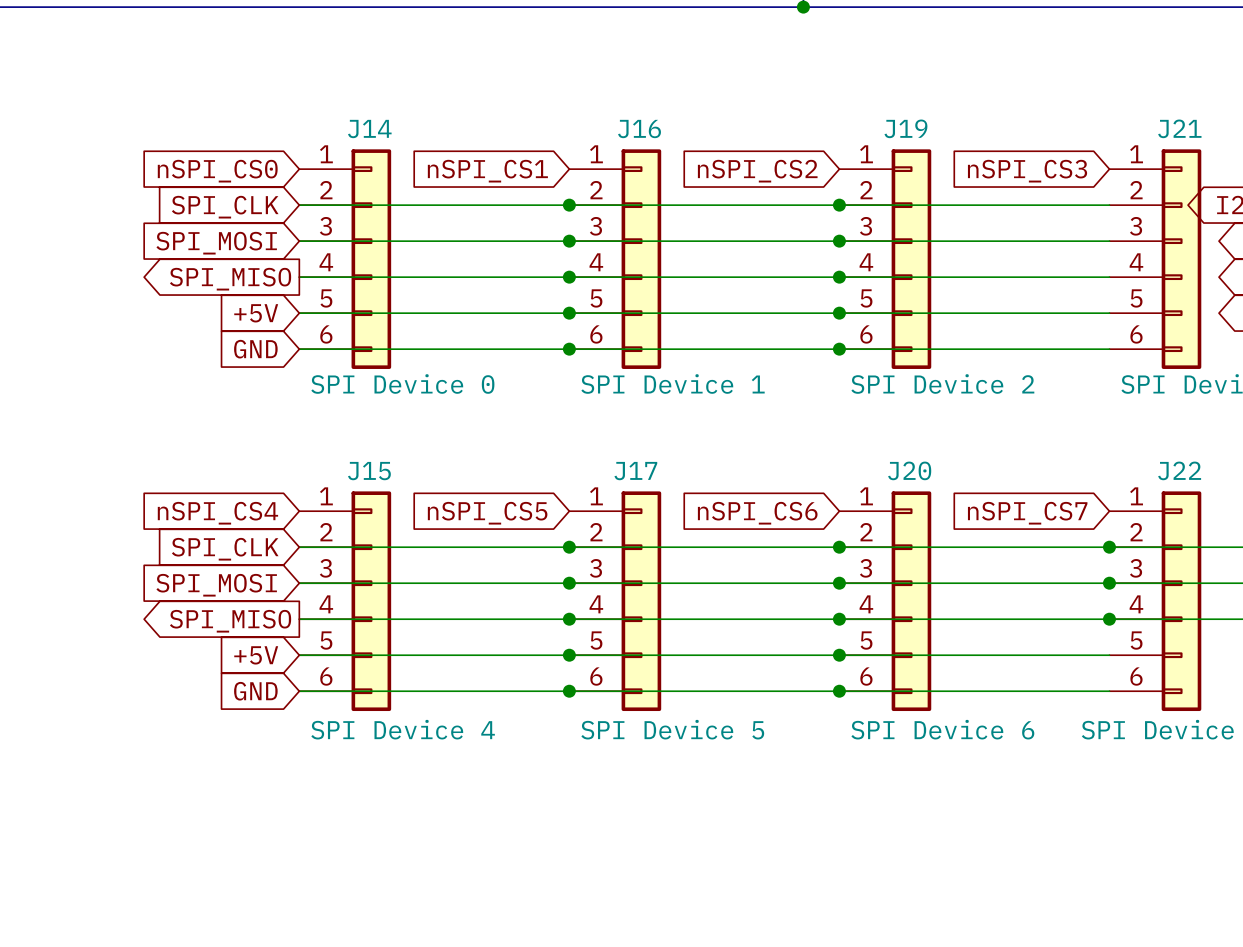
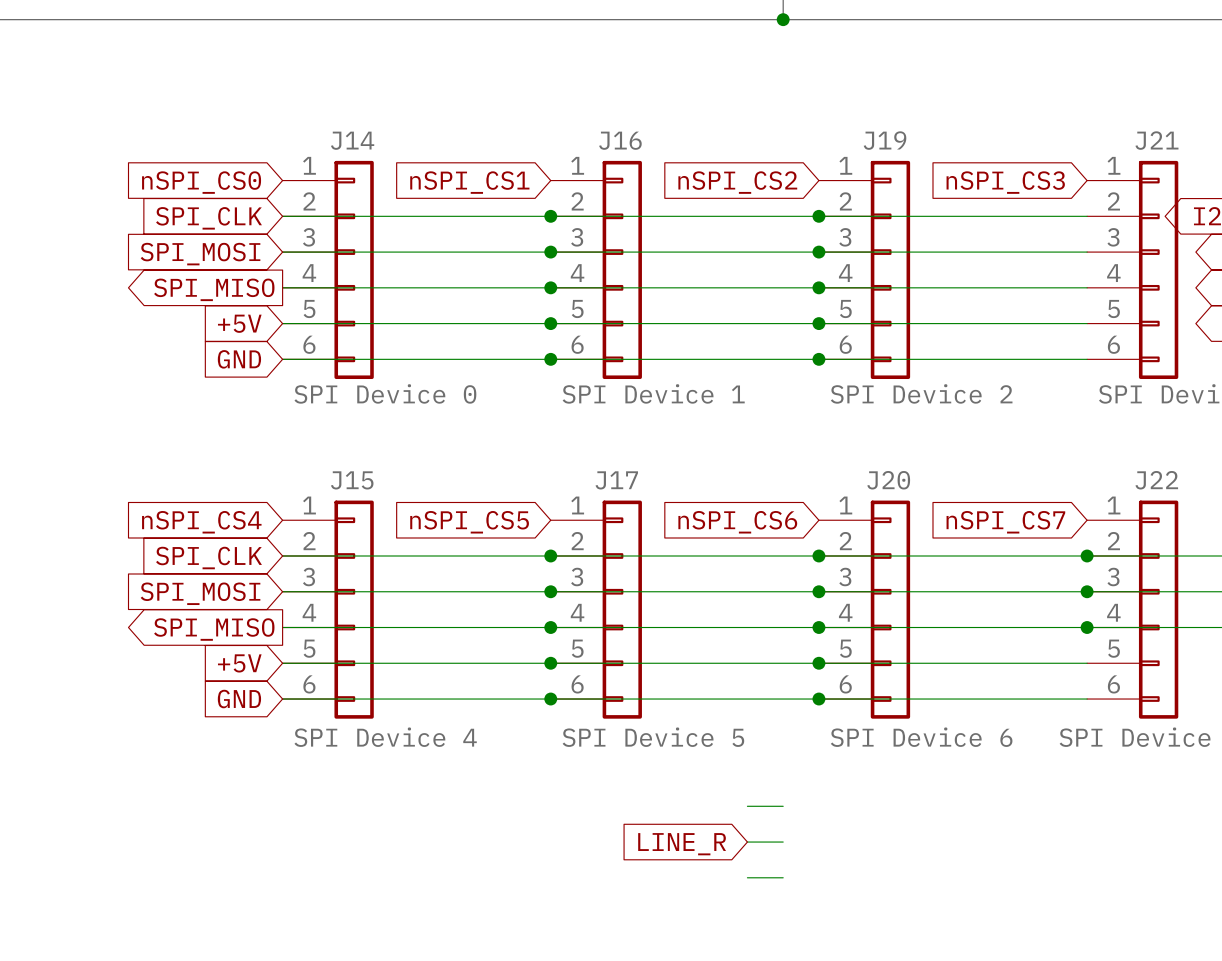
wire: none -> (747, 806) (783, 806)
wire: none -> (747, 842) (783, 842)
global label: none -> LINE_R (682, 844)
wire: none -> (747, 877) (783, 877)

